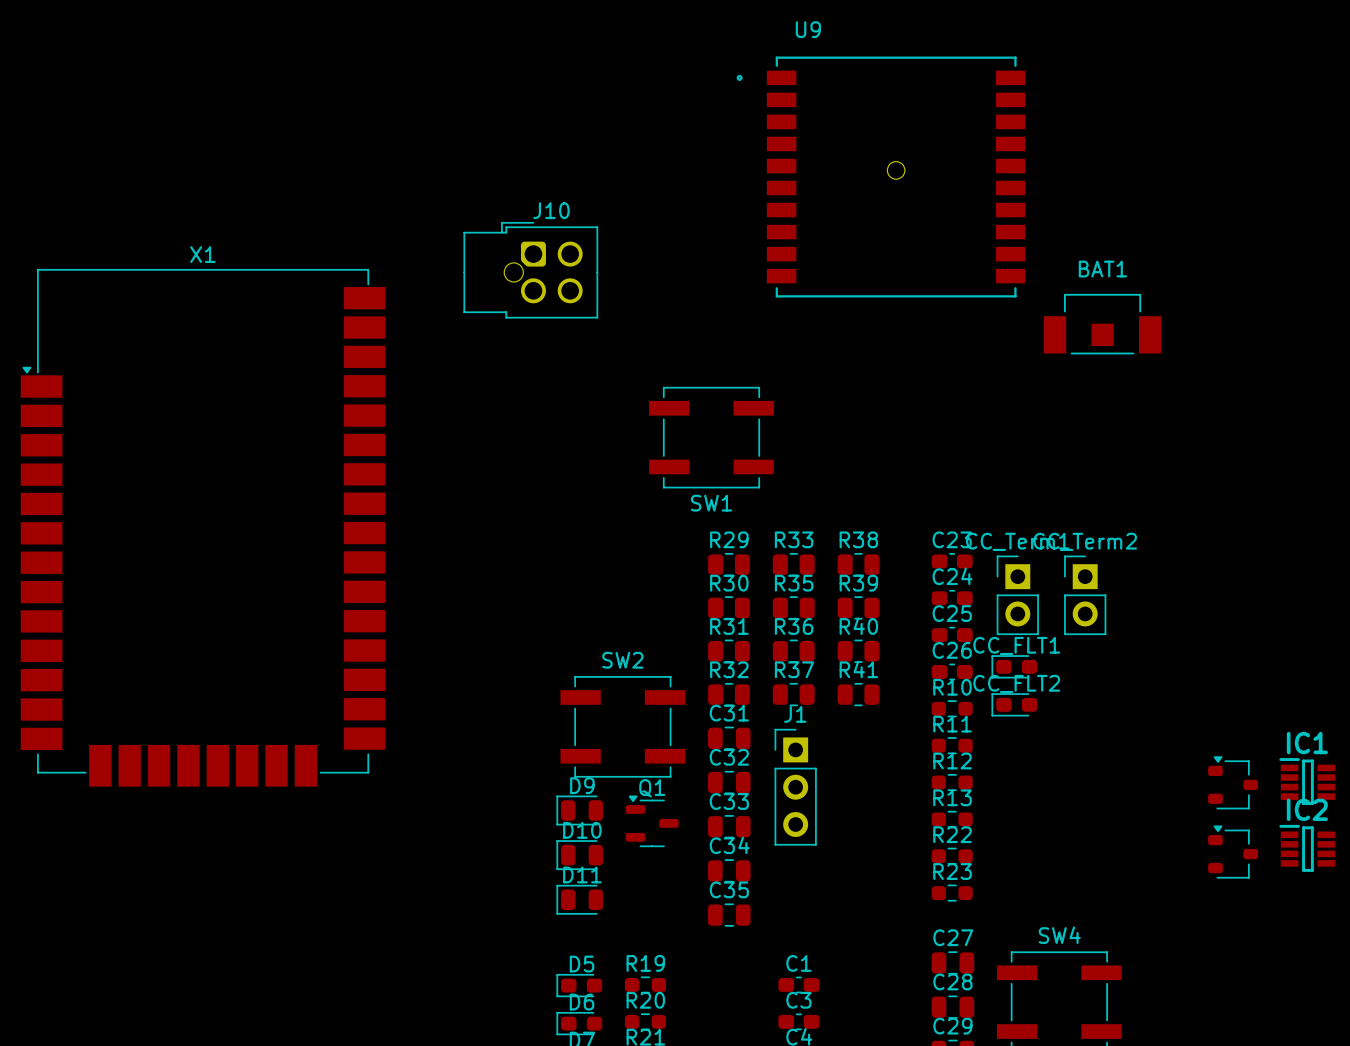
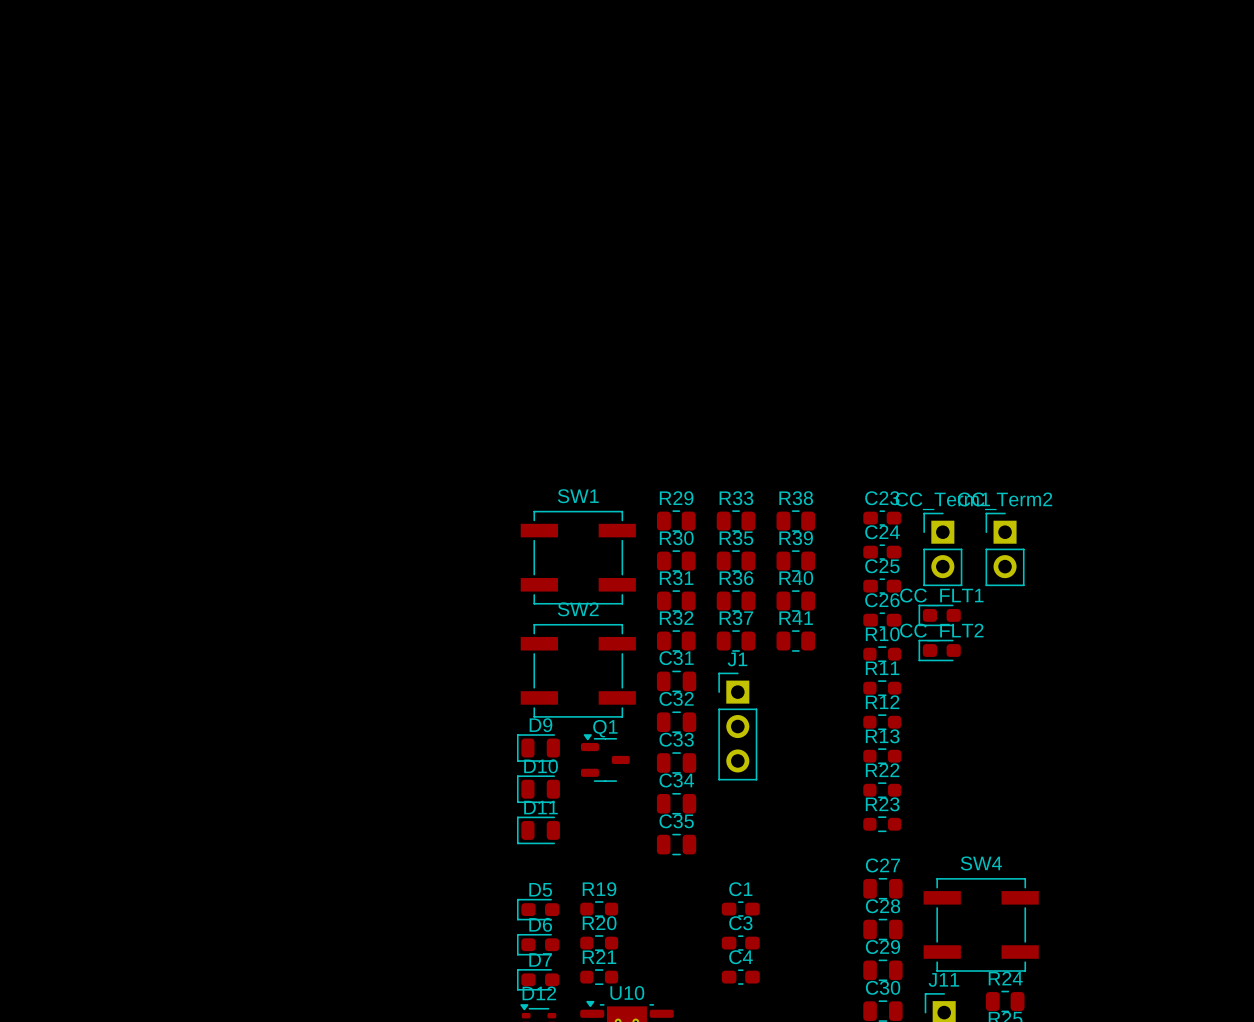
U9: (881, 177) -> none
J10: (530, 270) -> none
BAT1: (1102, 324) -> none
SW1 position: (711, 437) -> (578, 557)
SW1 name position: SW1 (711, 503) -> SW1 (578, 496)
X1: (203, 527) -> none
IC1: (1307, 781) -> none
part: (1233, 782) -> none
IC2: (1307, 848) -> none
part: (1233, 852) -> none

